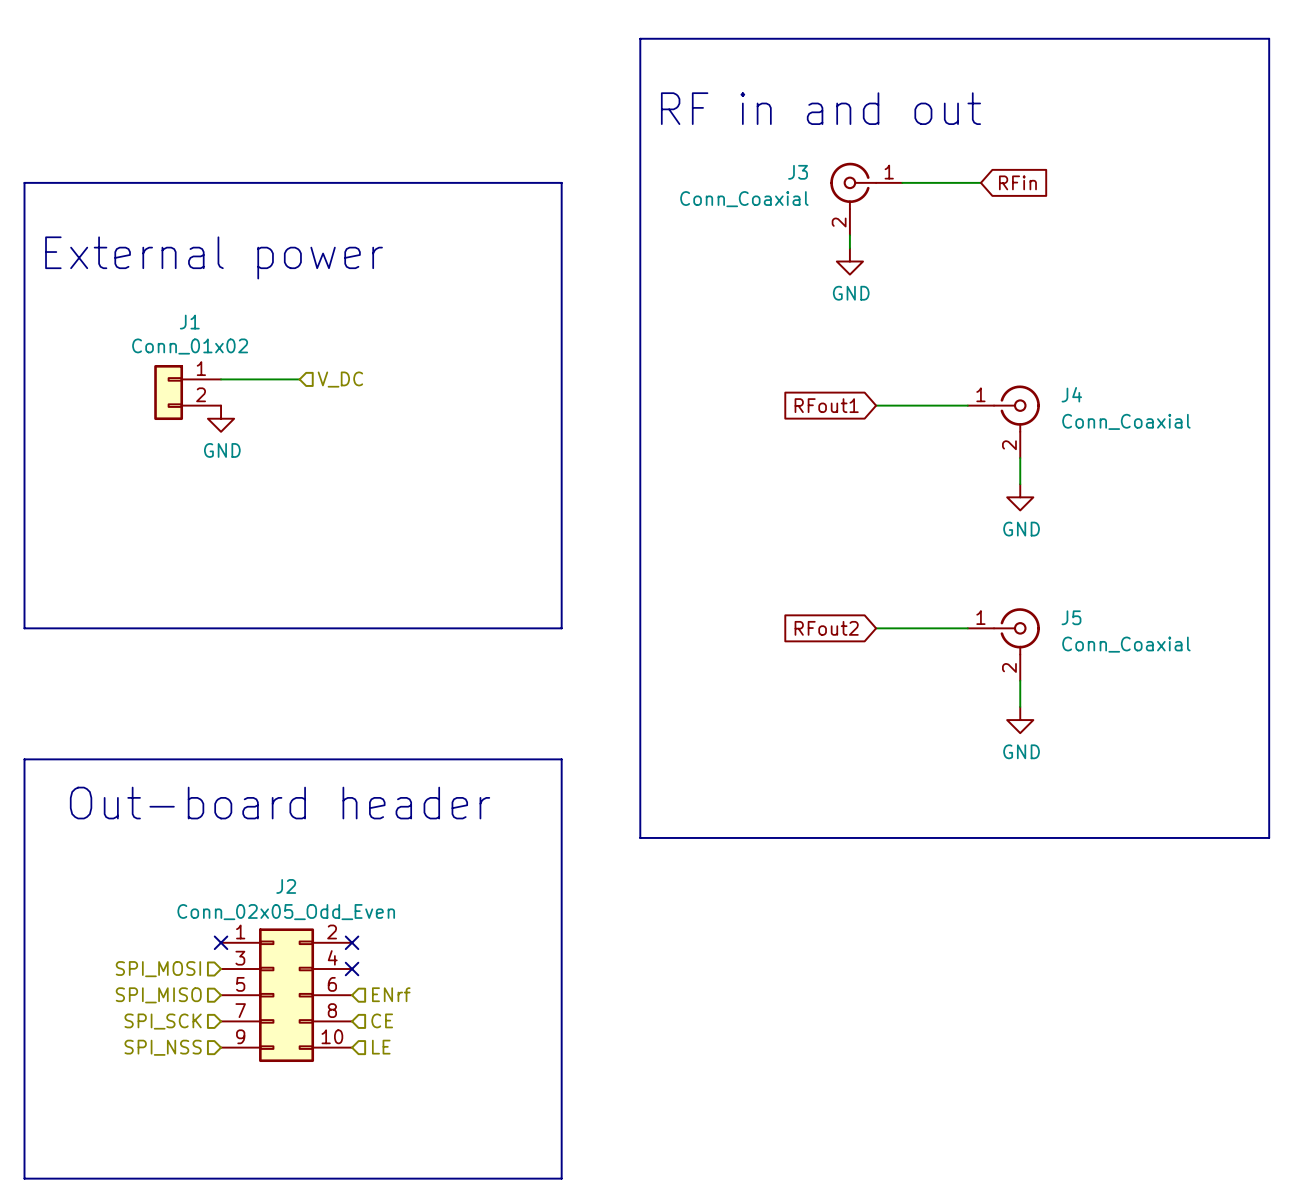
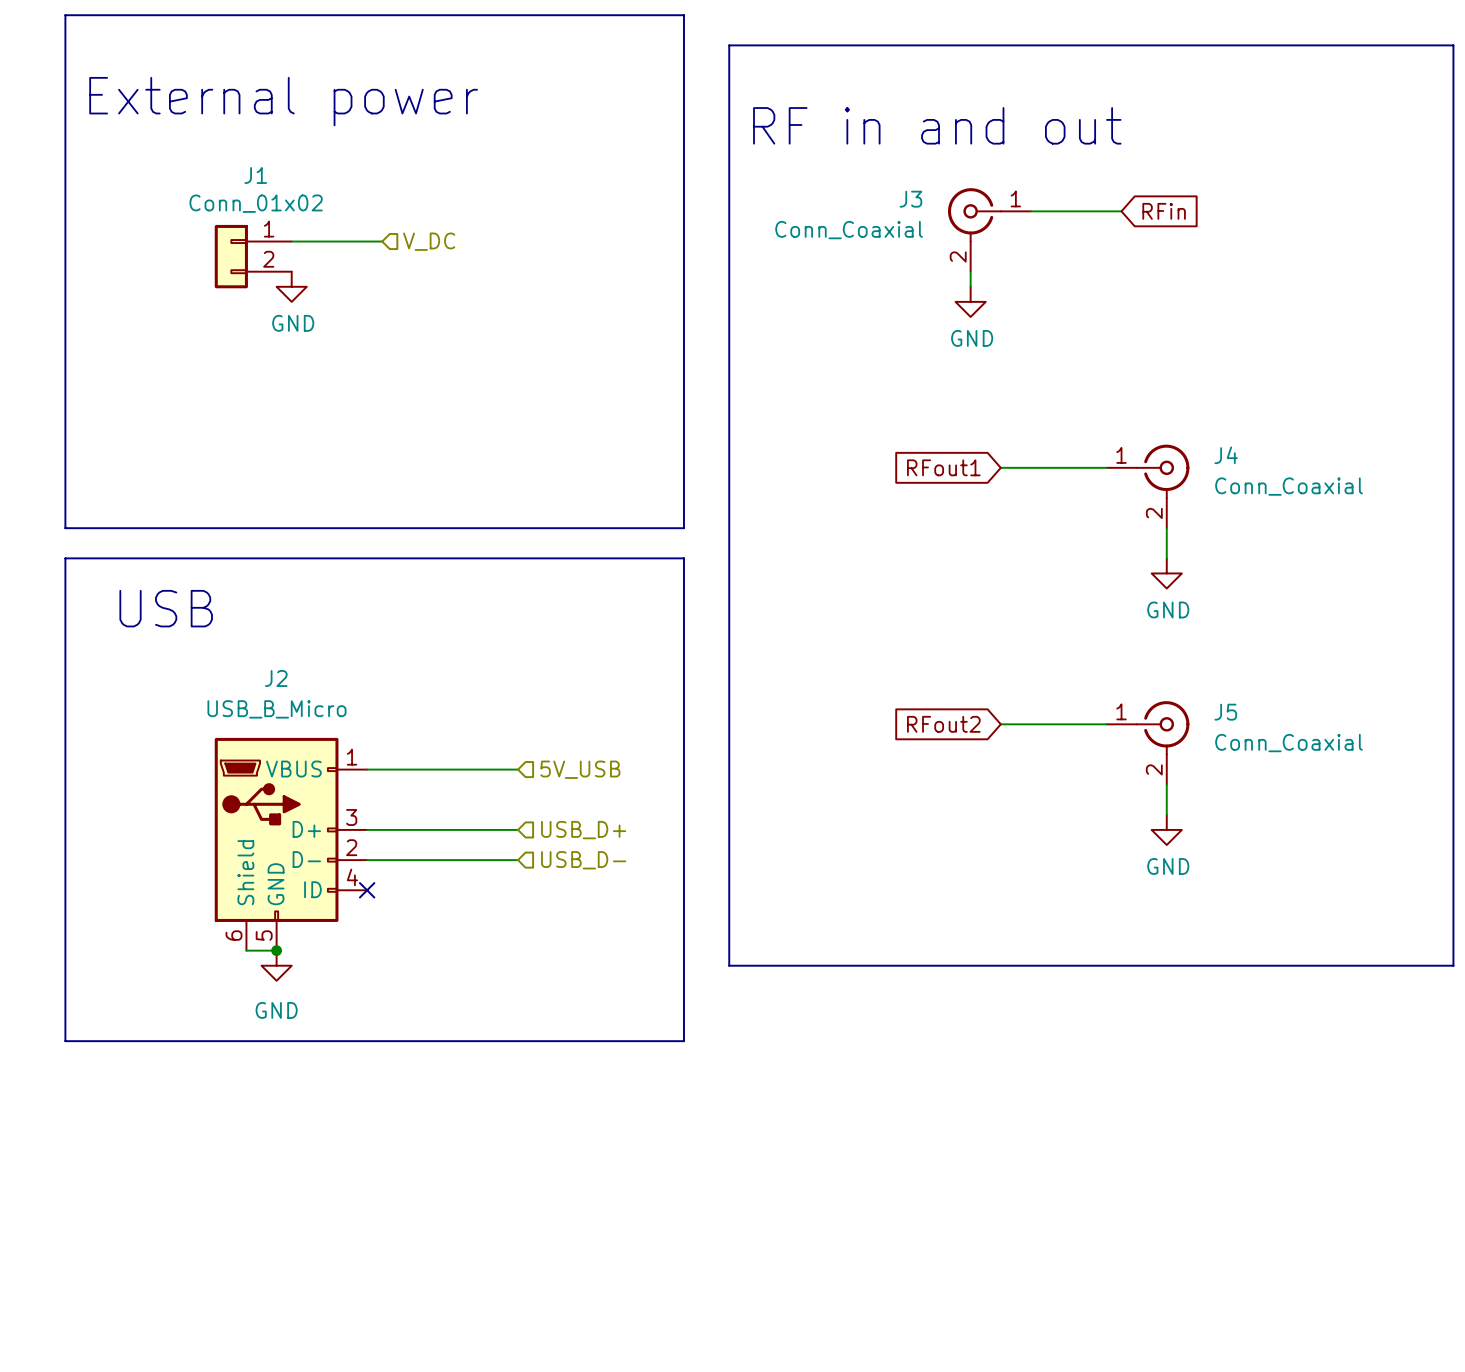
line: (24, 182) (561, 182) (561, 628) (24, 628) (24, 182) -> (65, 15) (683, 15) (683, 528) (65, 528) (65, 15)
text position: External power (214, 257) -> External power (283, 101)
wire: (221, 379) (299, 379) -> (291, 241) (382, 241)
hierarchical label position: V_DC (340, 379) -> V_DC (429, 241)
J1 position: (187, 392) -> (253, 256)
power symbol position: GND (221, 418) -> GND (291, 286)
line: none -> (65, 558) (65, 1041) (683, 1041) (683, 558) (65, 558)
text: none -> USB (166, 608)
wire: none -> (367, 769) (518, 769)
hierarchical label: none -> 5V_USB (580, 769)
wire: none -> (367, 829) (518, 829)
hierarchical label: none -> USB_D+ (583, 830)
wire: none -> (367, 860) (518, 860)
hierarchical label: none -> USB_D- (583, 860)
line: (24, 759) (24, 1178) (561, 1178) (561, 759) (24, 759) -> none
no-connect mark: none -> (367, 890)
text: Out-board header (280, 803) -> none
wire: none -> (246, 950) (276, 950)
junction: none -> (276, 950)
power symbol: none -> GND (276, 965)
J2 name position: J2 (286, 886) -> J2 (276, 678)
J2 value: Conn_02x05_Odd_Even (286, 912) -> USB_B_Micro (276, 709)
J2 symbol: [221, 928, 353, 1063] -> [214, 737, 368, 951]
no-connect mark: (221, 942) -> none
no-connect mark: (352, 942) -> none
hierarchical label: SPI_MOSI (158, 969) -> none
no-connect mark: (352, 969) -> none
hierarchical label: ENrf (391, 994) -> none
hierarchical label: SPI_MISO (158, 995) -> none
hierarchical label: CE (382, 1020) -> none
hierarchical label: SPI_SCK (163, 1021) -> none
hierarchical label: SPI_NSS (163, 1047) -> none
hierarchical label: LE (381, 1047) -> none

